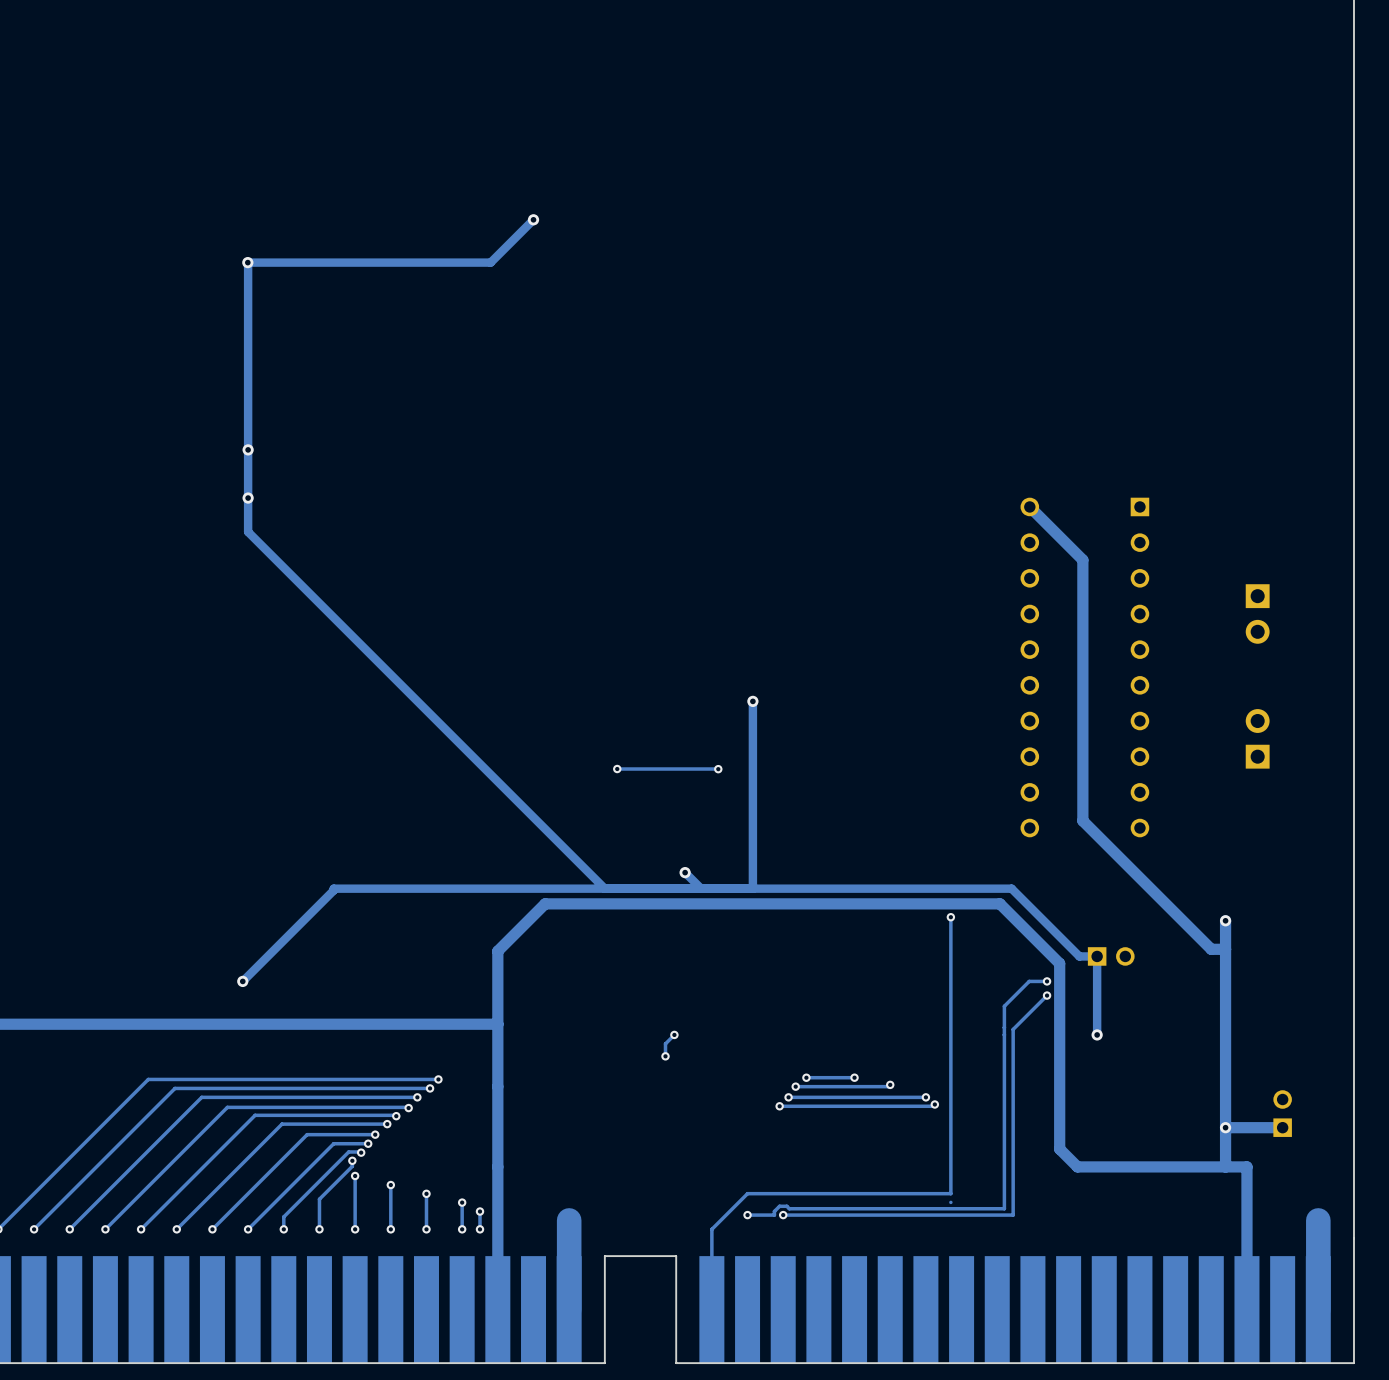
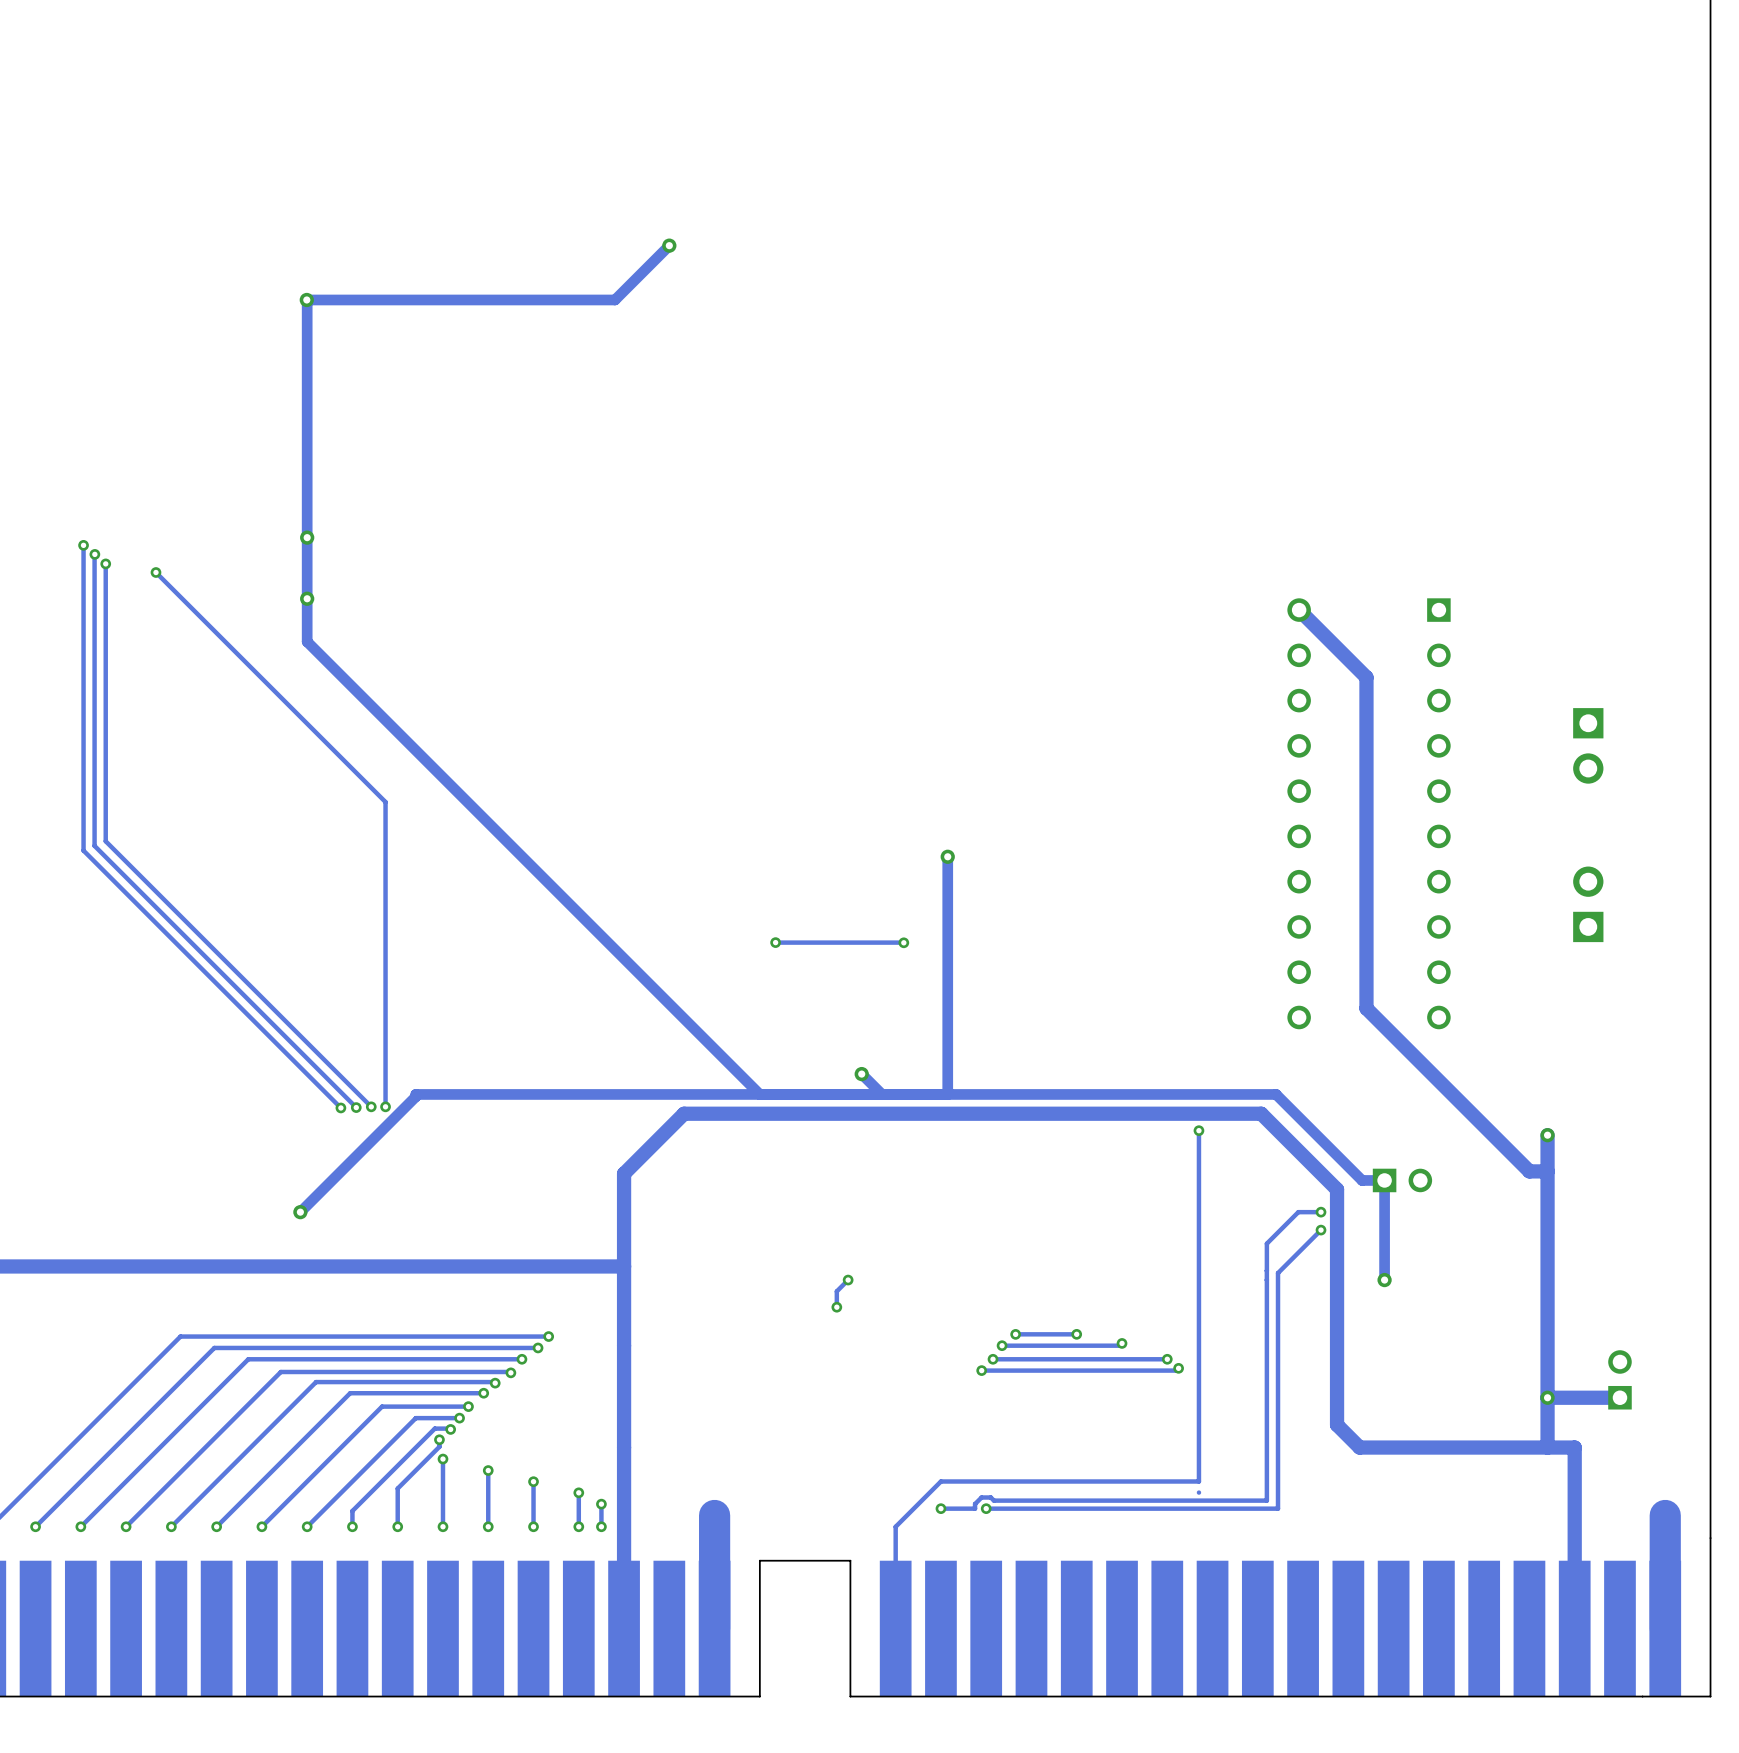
track: none -> (83, 545) (83, 850) (340, 1107)
via: none -> (83, 545)
track: none -> (94, 554) (94, 845) (356, 1107)
via: none -> (94, 554)
track: none -> (105, 563) (105, 841) (371, 1106)
via: none -> (105, 563)
track: none -> (155, 572) (385, 802) (385, 1106)
via: none -> (155, 572)
via: none -> (371, 1106)
via: none -> (385, 1106)
via: none -> (340, 1107)
via: none -> (356, 1107)

